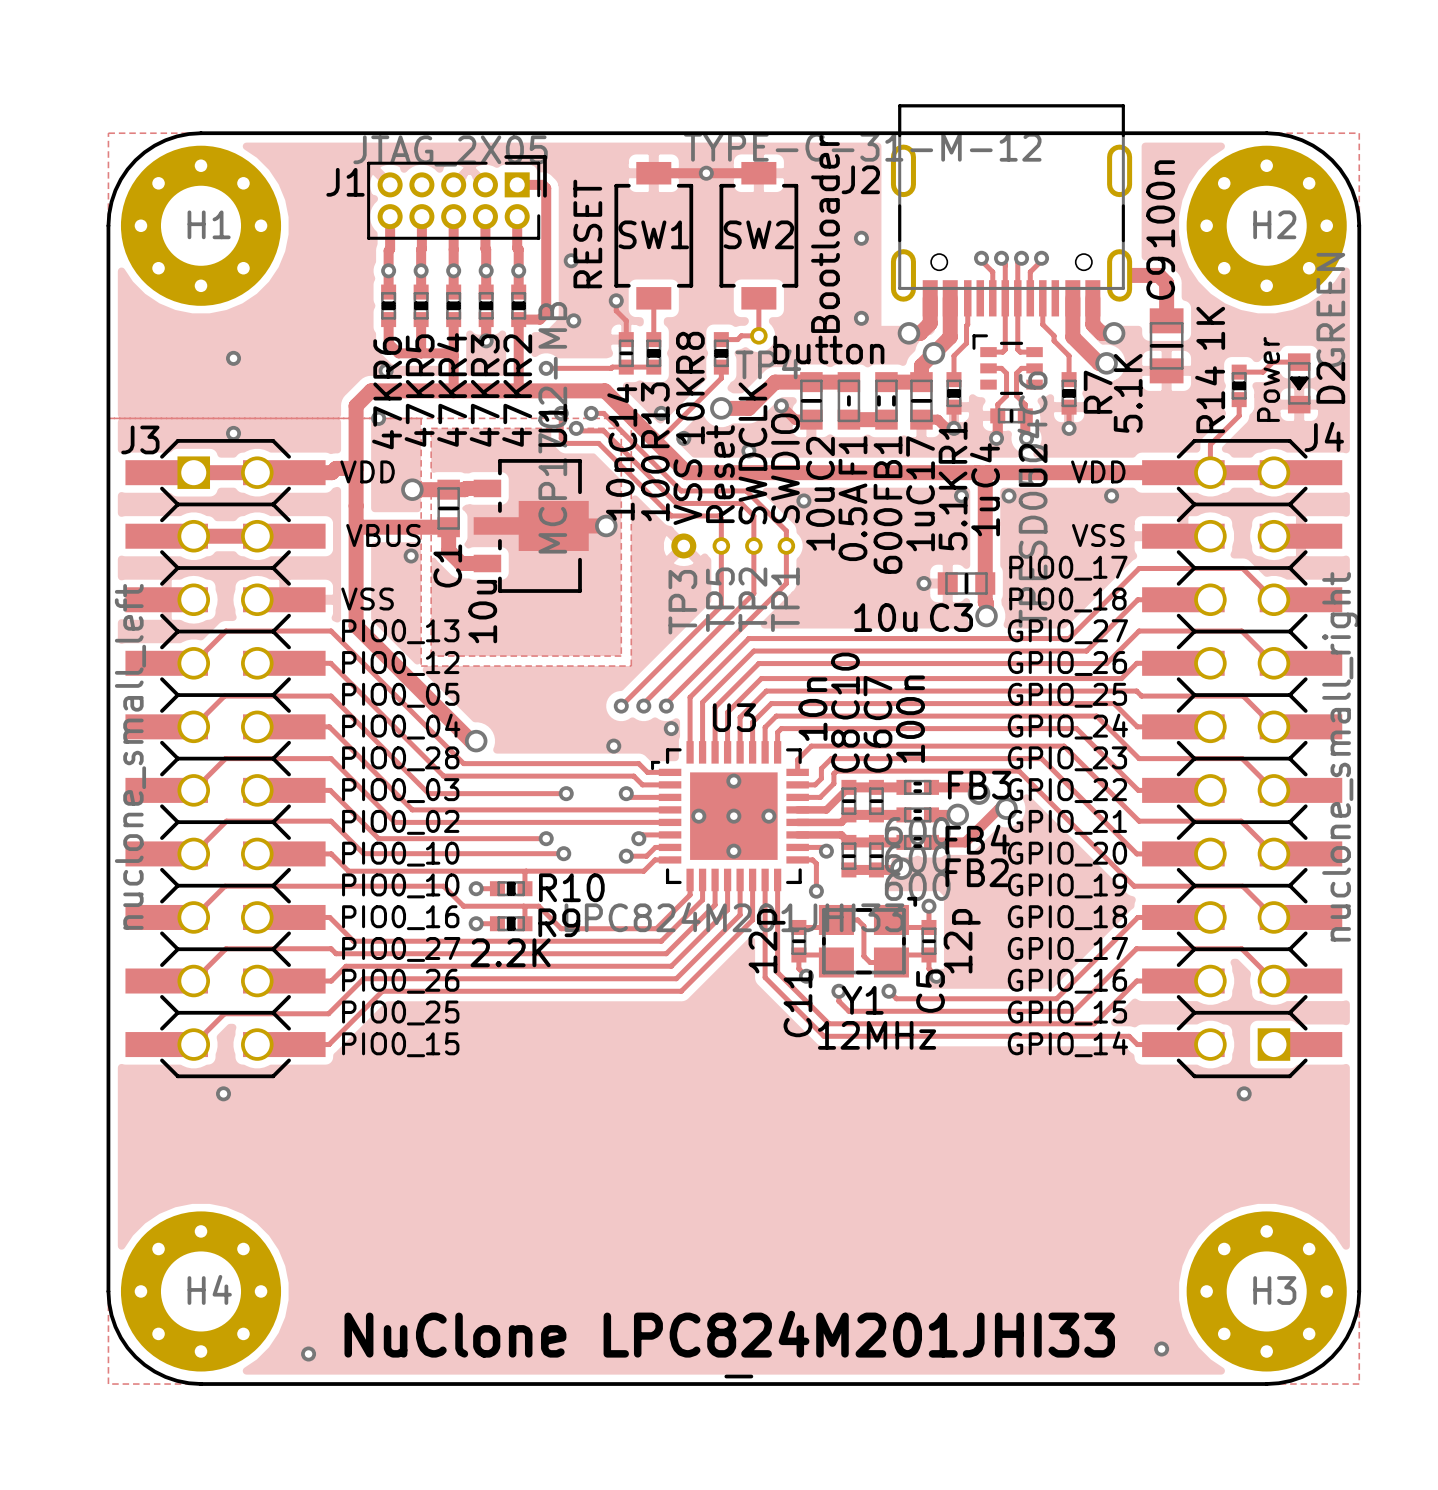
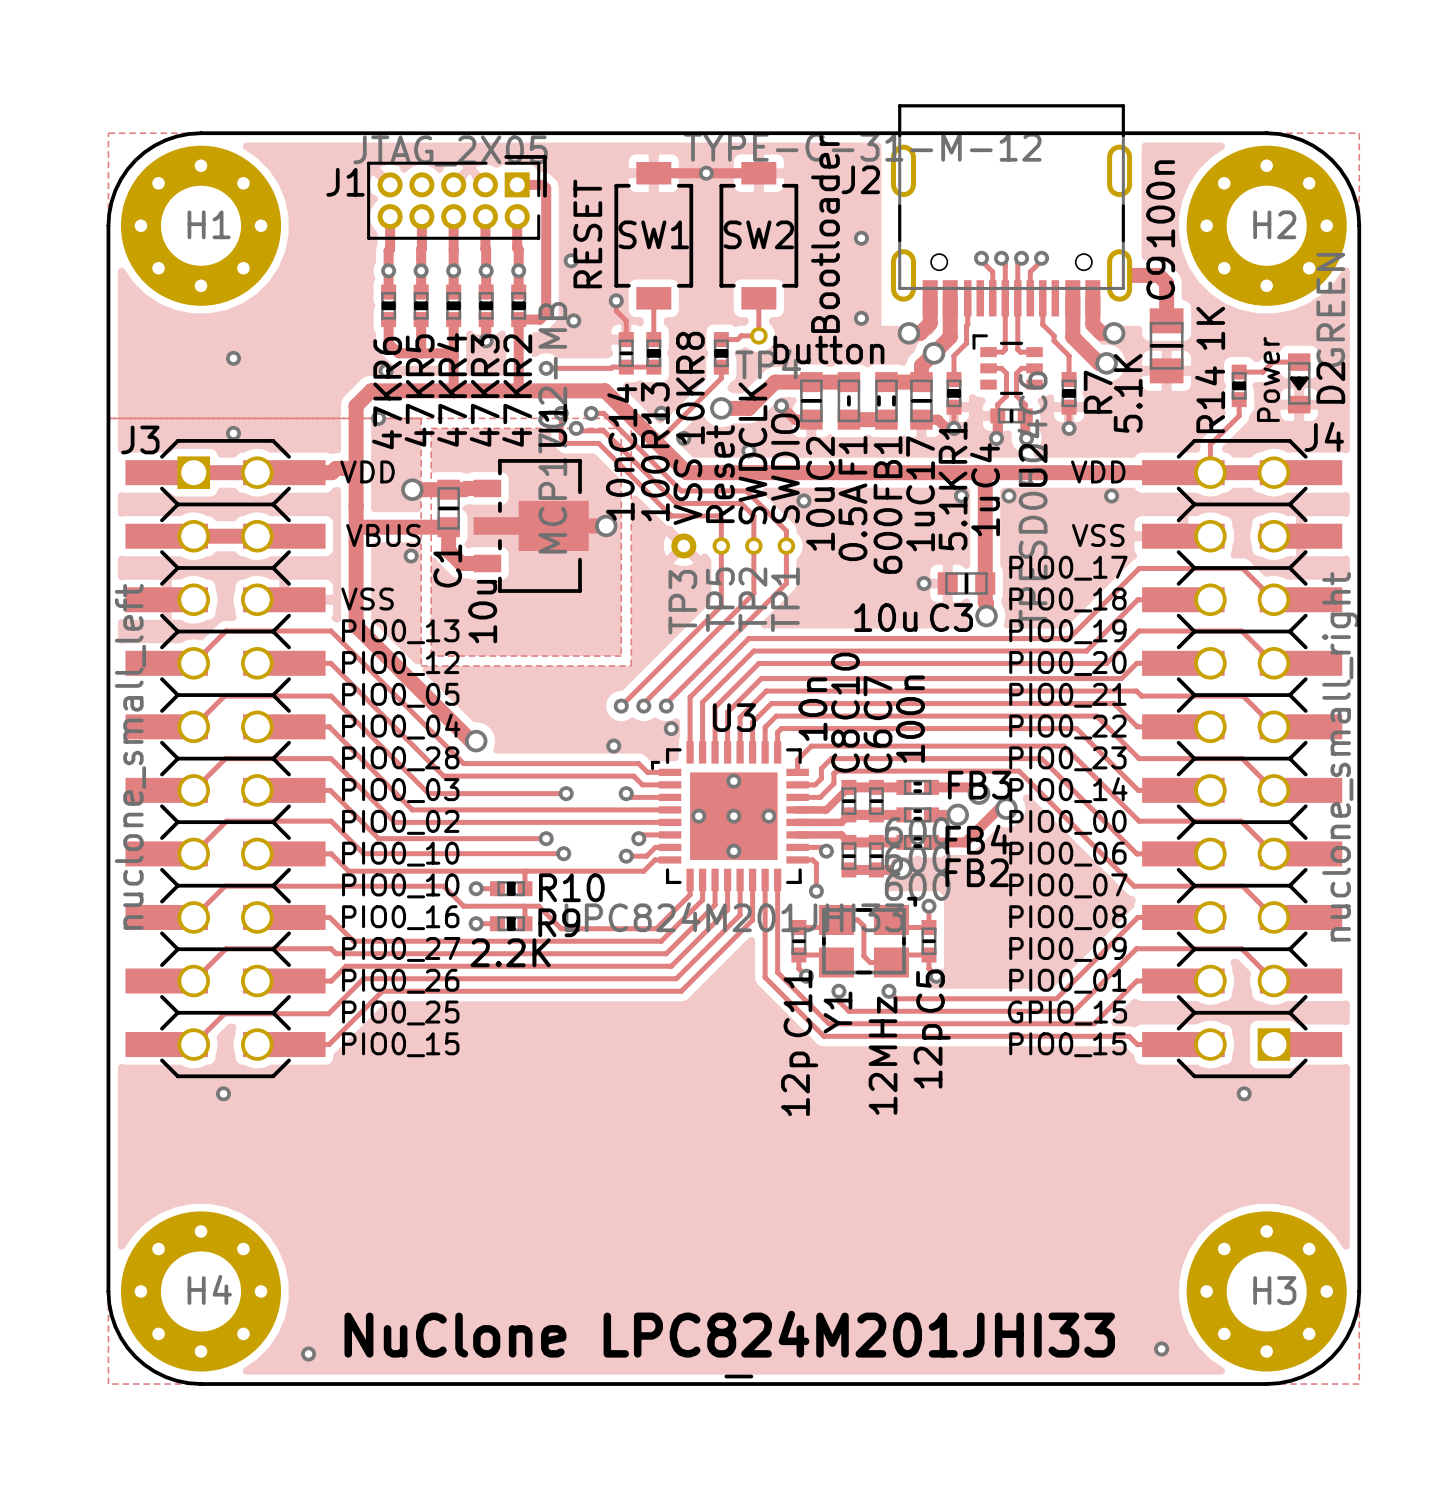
J4 footprint: [1142, 439, 1343, 1079] -> [1142, 439, 1343, 1079]
C11 value position: 12p (767, 941) -> 12p (799, 1083)
C5 value position: 12p (962, 941) -> 12p (932, 1056)
Y1 name rotation: 0° (862, 1000) -> 90° counterclockwise (837, 1012)
Y1 value rotation: 0° (877, 1035) -> 90° counterclockwise (883, 1055)

